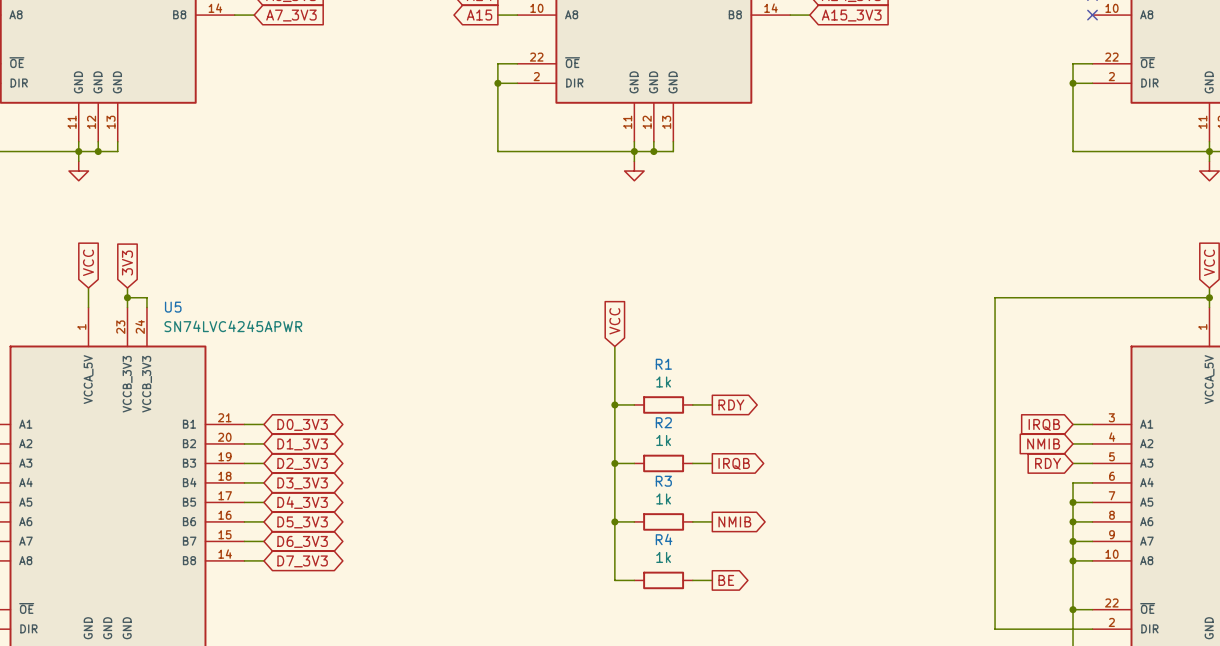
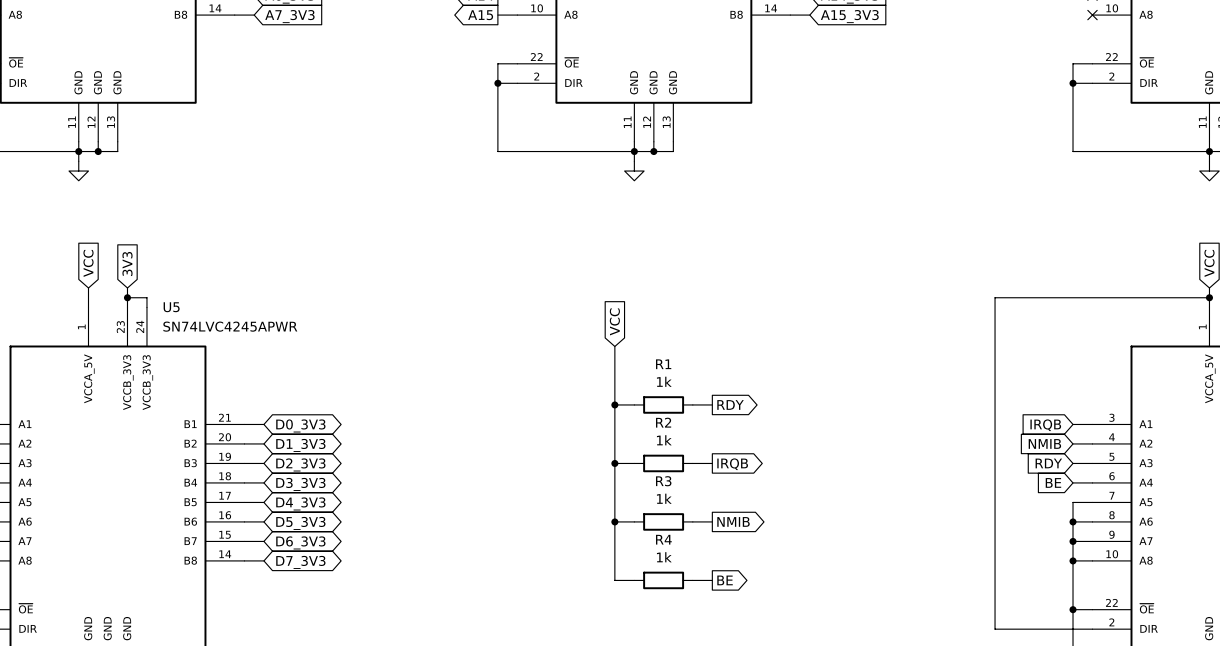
global label: none -> BE (1053, 482)
wire: (1073, 482) (1073, 502) -> none
junction: (1073, 502) -> none

